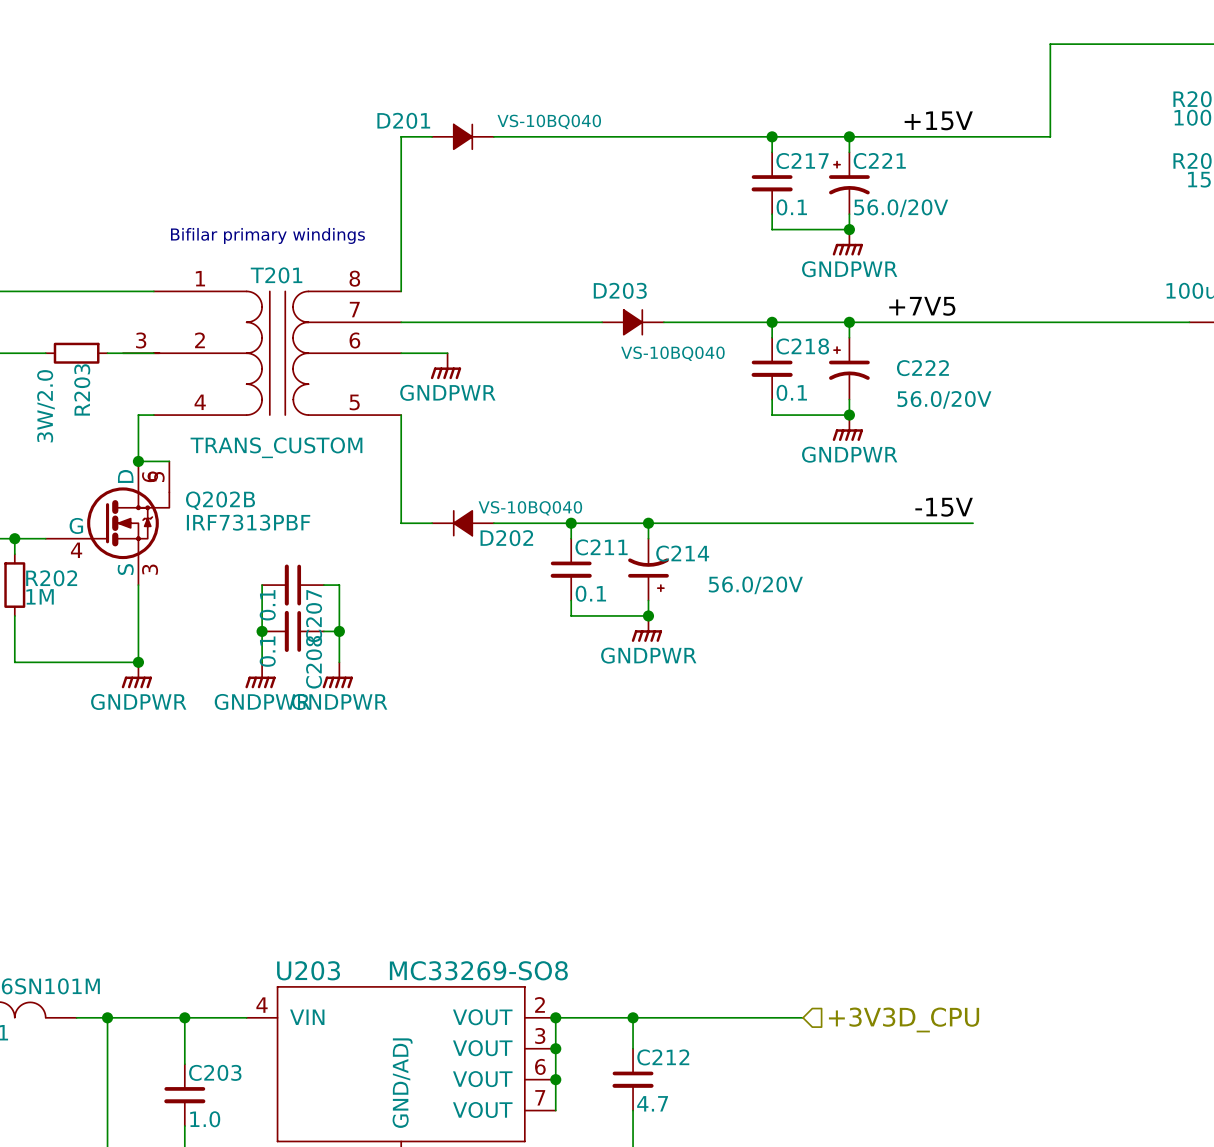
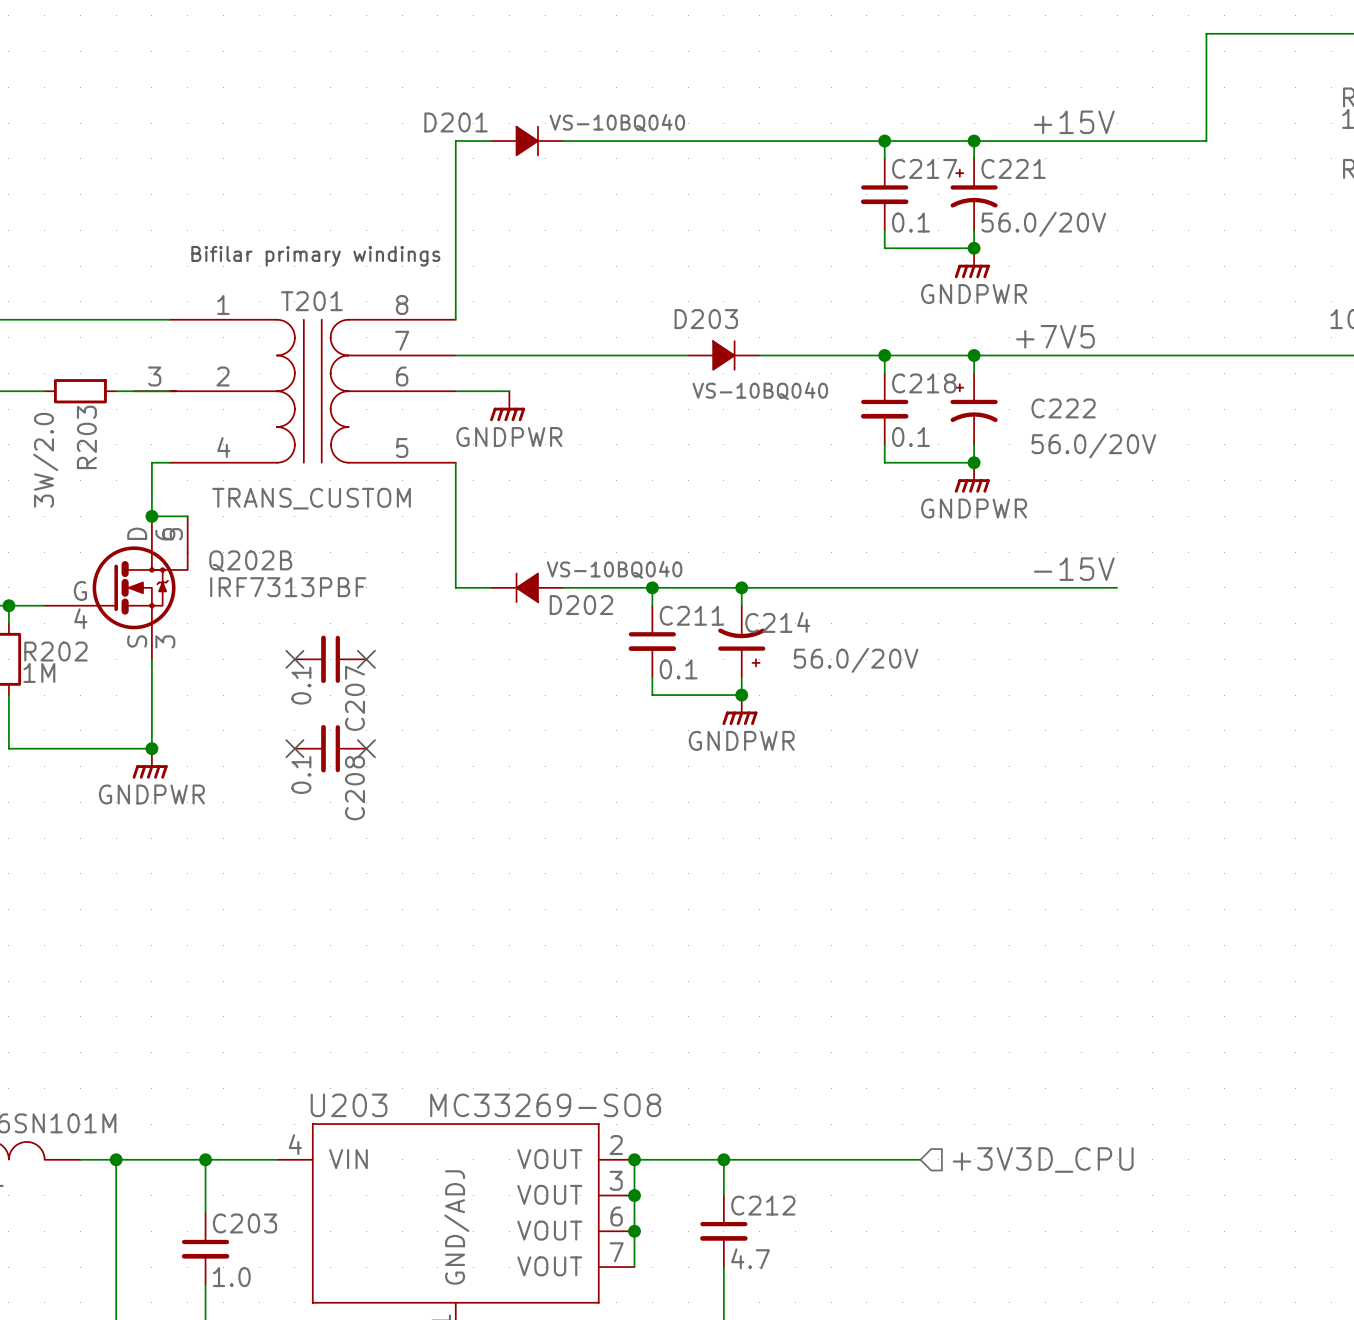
wire: (262, 585) (262, 662) -> none
no-connect mark: none -> (294, 659)
wire: (323, 585) (339, 585) (339, 662) -> none
no-connect mark: none -> (366, 659)
junction: (262, 631) -> none
C208 position: (293, 631) -> (330, 748)
wire: (323, 631) (339, 631) -> none
junction: (339, 631) -> none
no-connect mark: none -> (294, 748)
no-connect mark: none -> (366, 748)
power symbol: GNDPWR (260, 675) -> none
power symbol: GNDPWR (337, 675) -> none

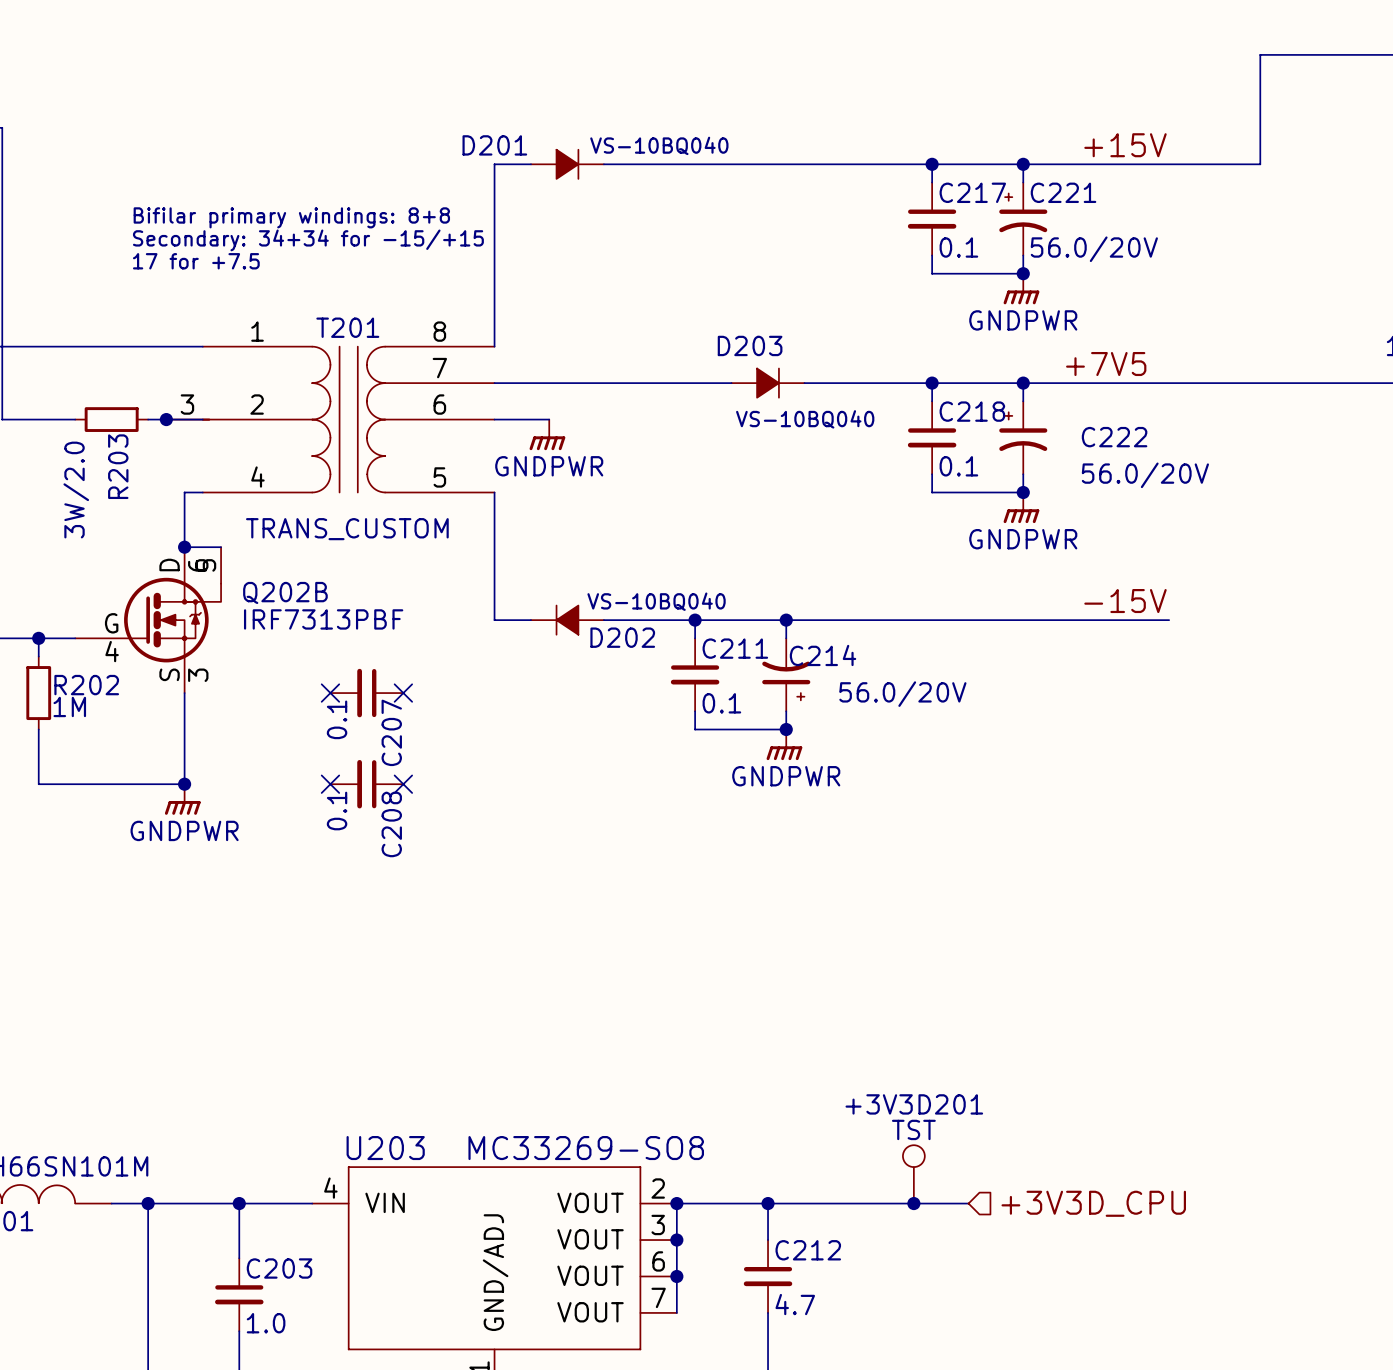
text: none -> Bifilar primary windings: 8+8 (291, 217)
text: none -> Secondary: 34+34 for -15/+15 (308, 240)
text: none -> 17 for +7.5 (196, 261)
text: Bifilar primary windings (315, 256) -> none
junction: none -> (166, 419)
+3V3D201: none -> TST (913, 1174)
junction: none -> (913, 1203)

